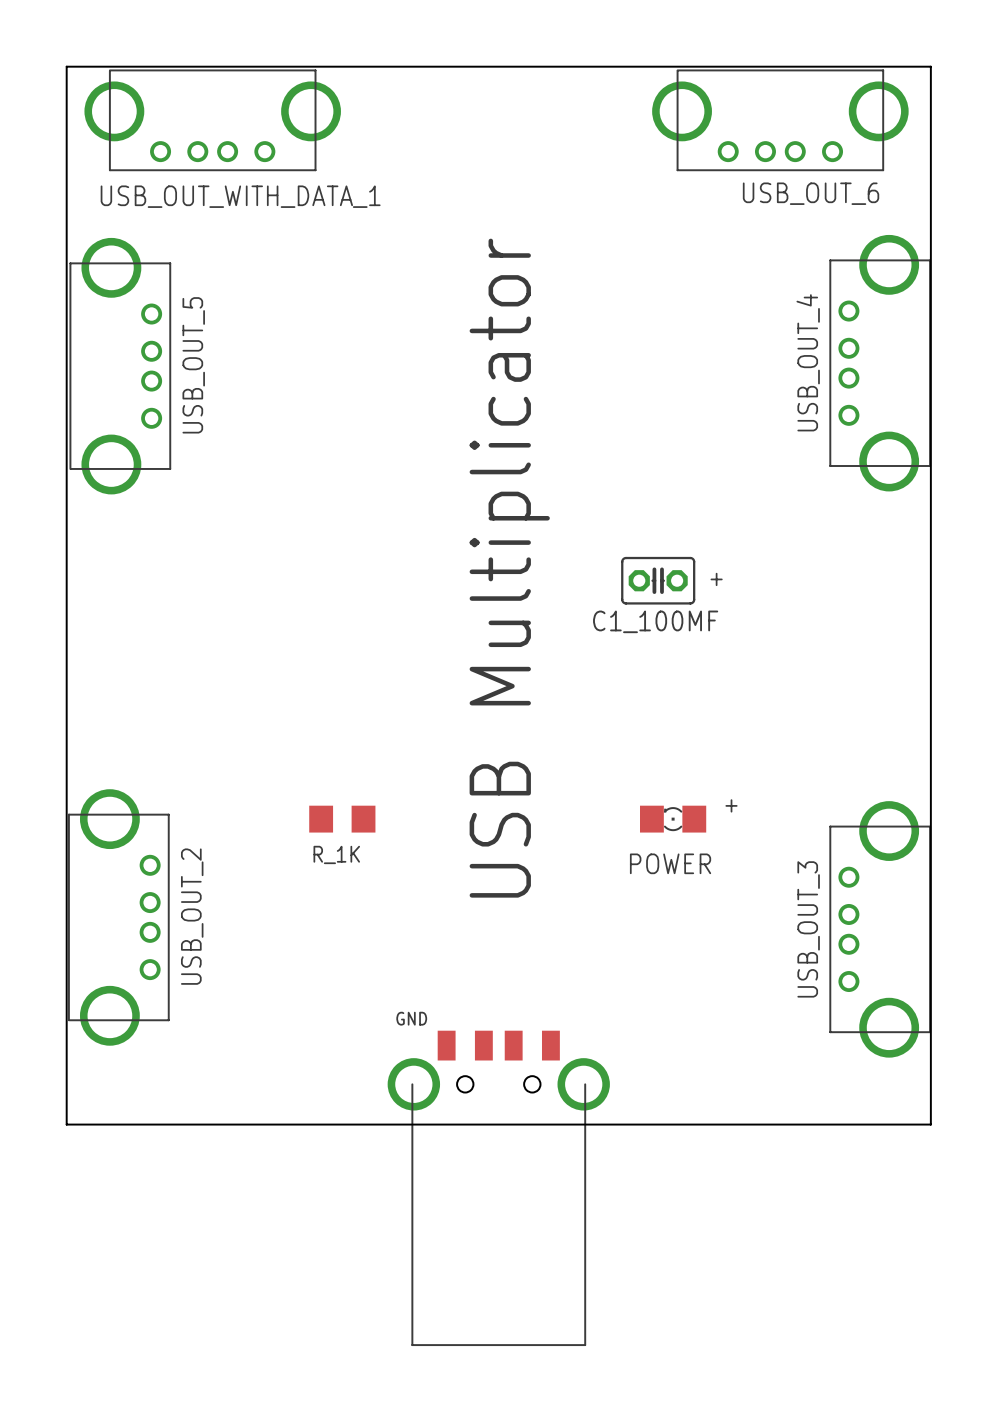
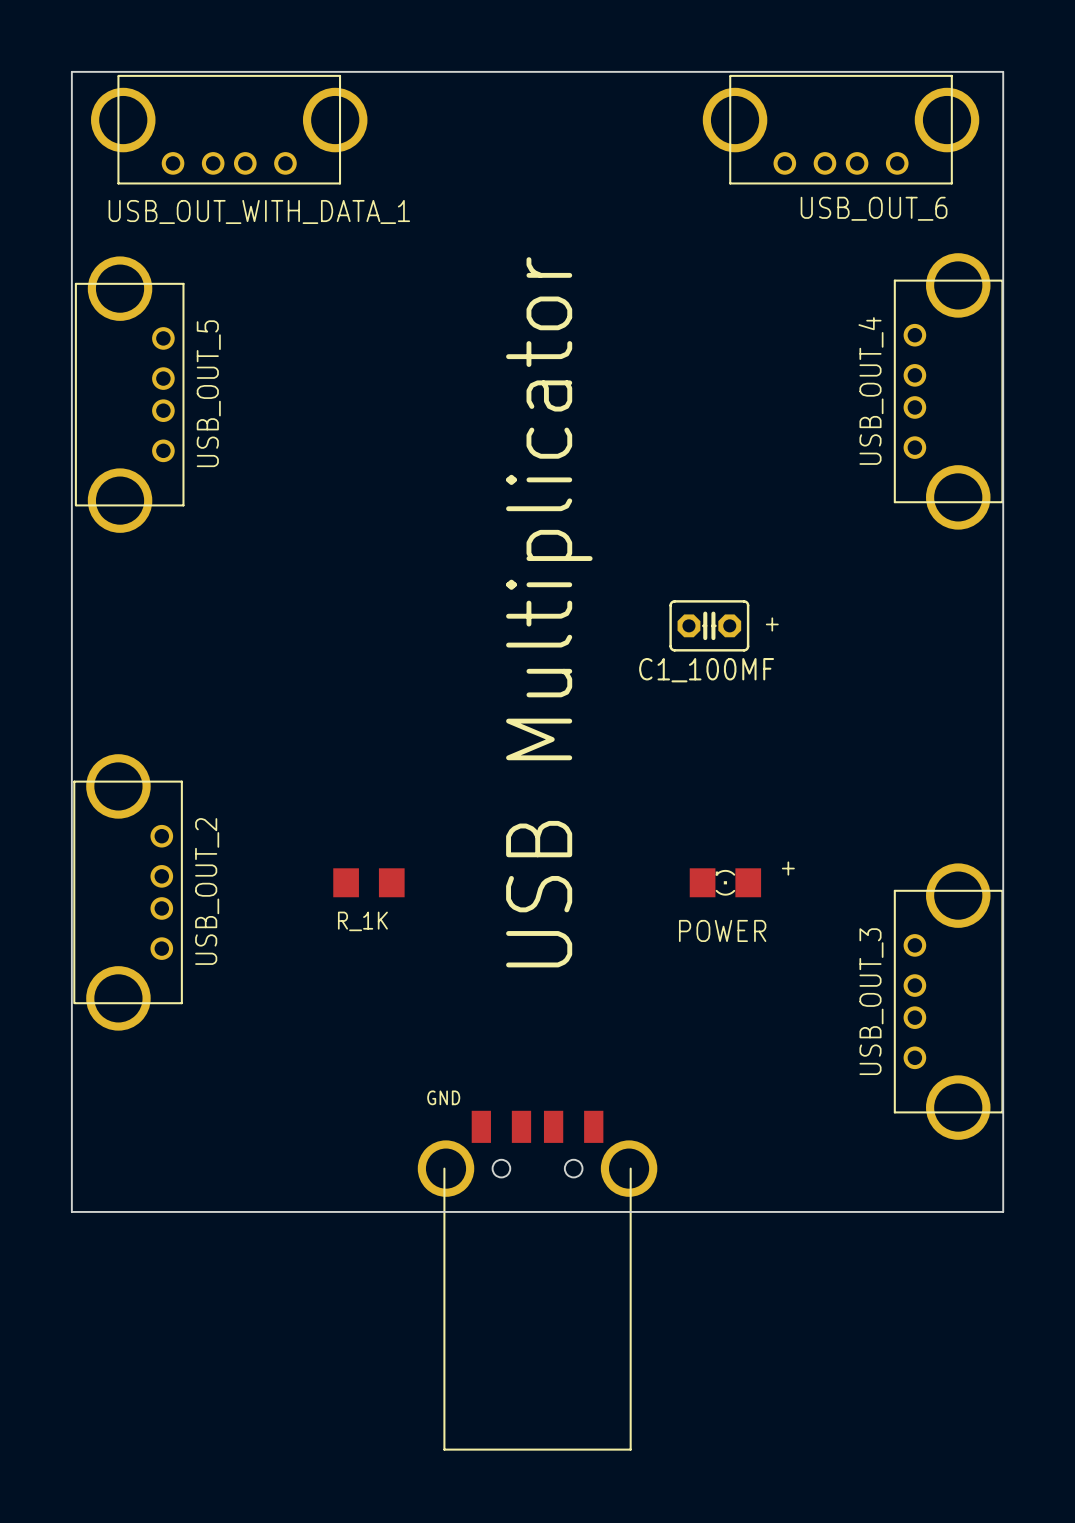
USB_OUT_2 position: (118, 917) -> (128, 892)

